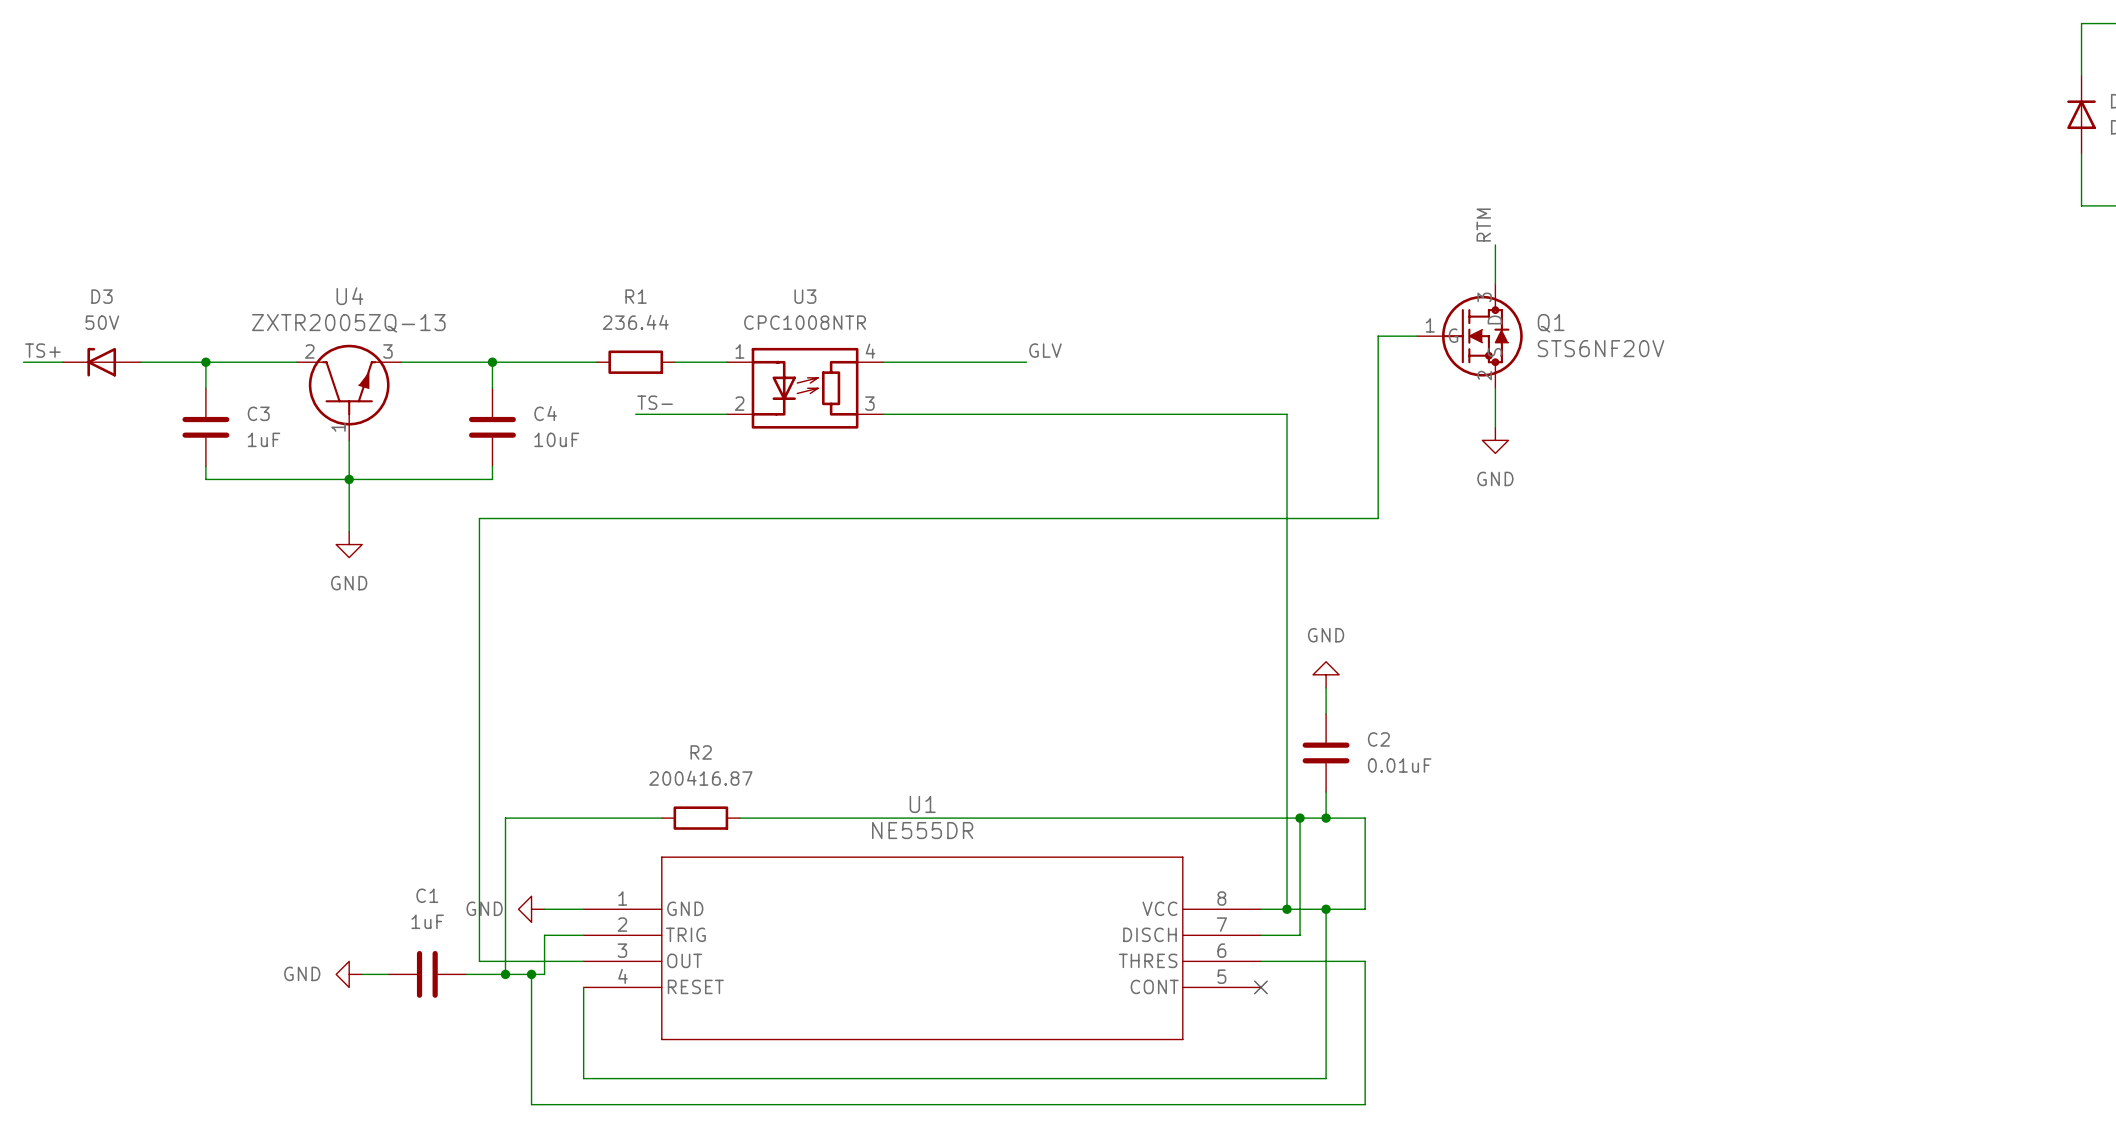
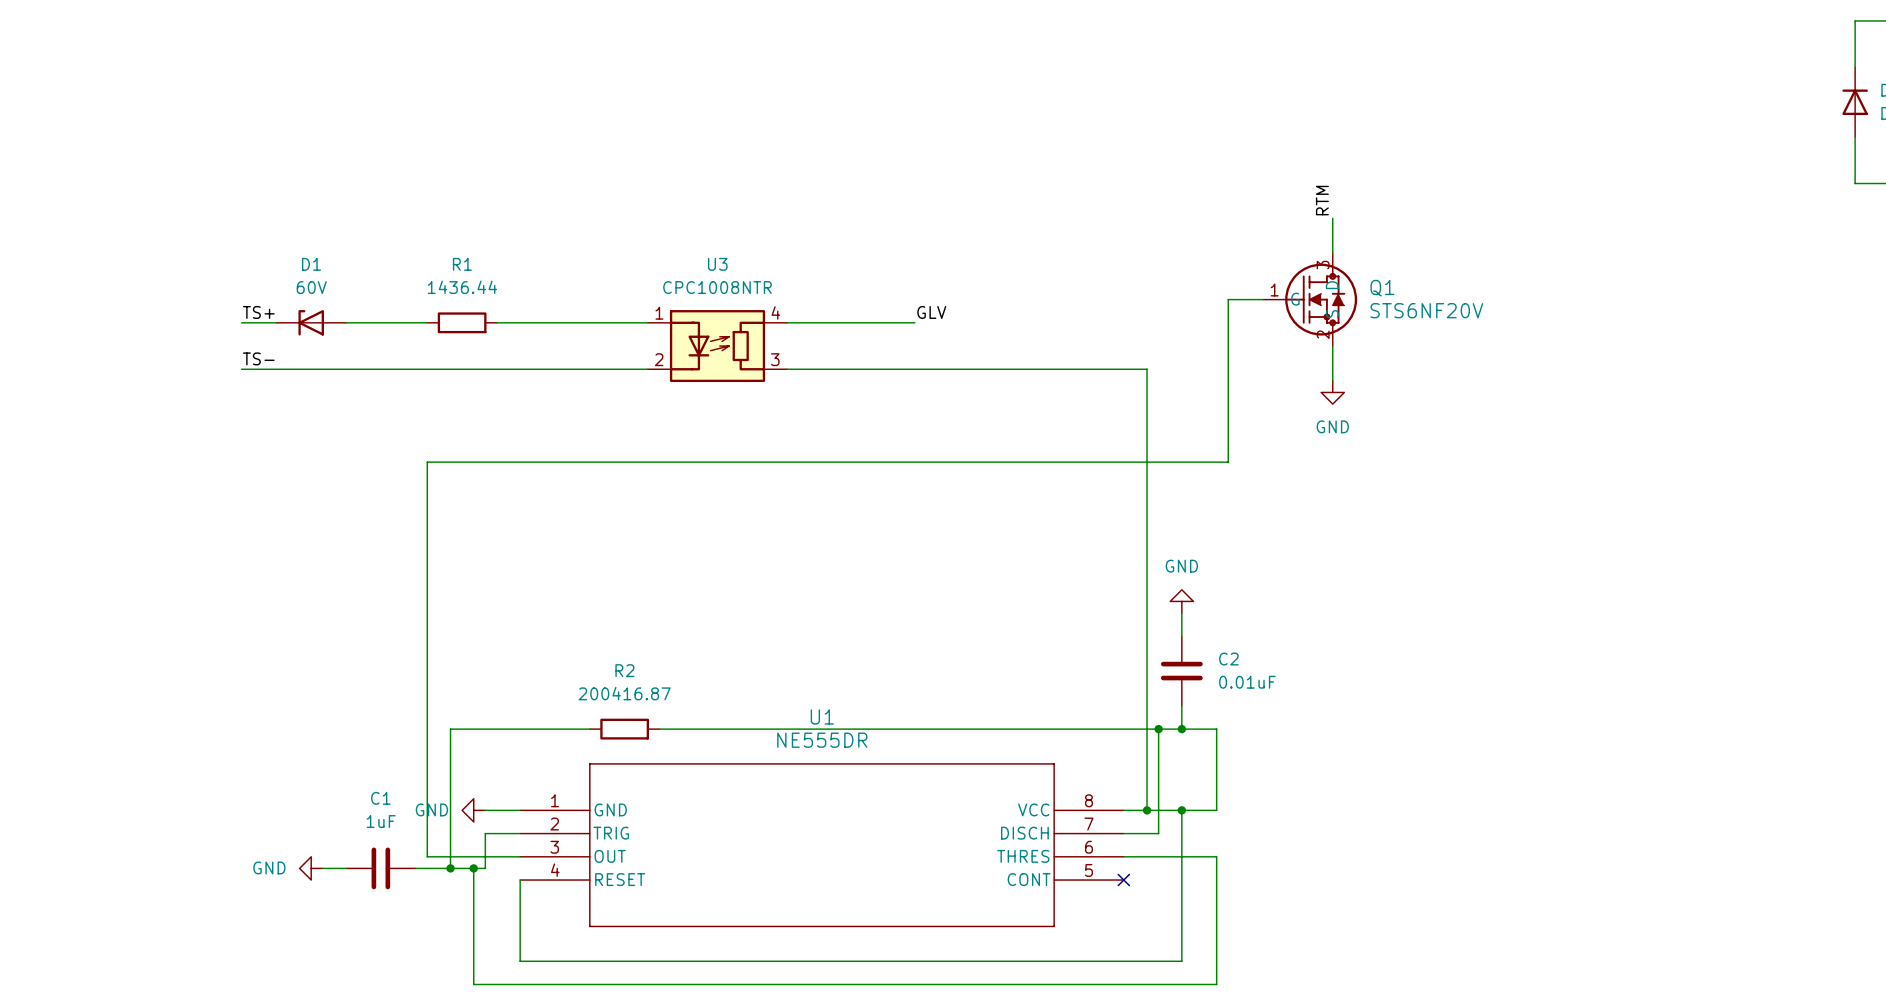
R1 value: 236.44 (635, 322) -> 1436.44 (462, 287)
label position: TS+ (42, 350) -> TS+ (258, 312)
wire: (23, 362) (62, 362) -> none
D3: 50V (101, 362) -> none
wire: (140, 362) (271, 362) -> none
wire: (205, 362) (205, 388) -> none
junction: (205, 362) -> none
D1: none -> 60V (311, 322)
wire: (479, 362) (557, 362) -> (531, 322) (601, 322)
wire: (492, 362) (492, 388) -> none
junction: (492, 362) -> none
R1 position: (635, 362) -> (462, 322)
U4: ZXTR2005ZQ-13 (349, 392) -> none
label: none -> TS- (258, 358)
label: TS- (655, 402) -> none
wire: none -> (241, 369) (566, 369)
C3: 1uF (205, 427) -> none
C4: 10uF (492, 427) -> none
wire: (349, 440) (349, 531) -> none
wire: (205, 466) (205, 479) (492, 479) (492, 466) -> none
junction: (349, 479) -> none
power symbol: GND (349, 544) -> none

